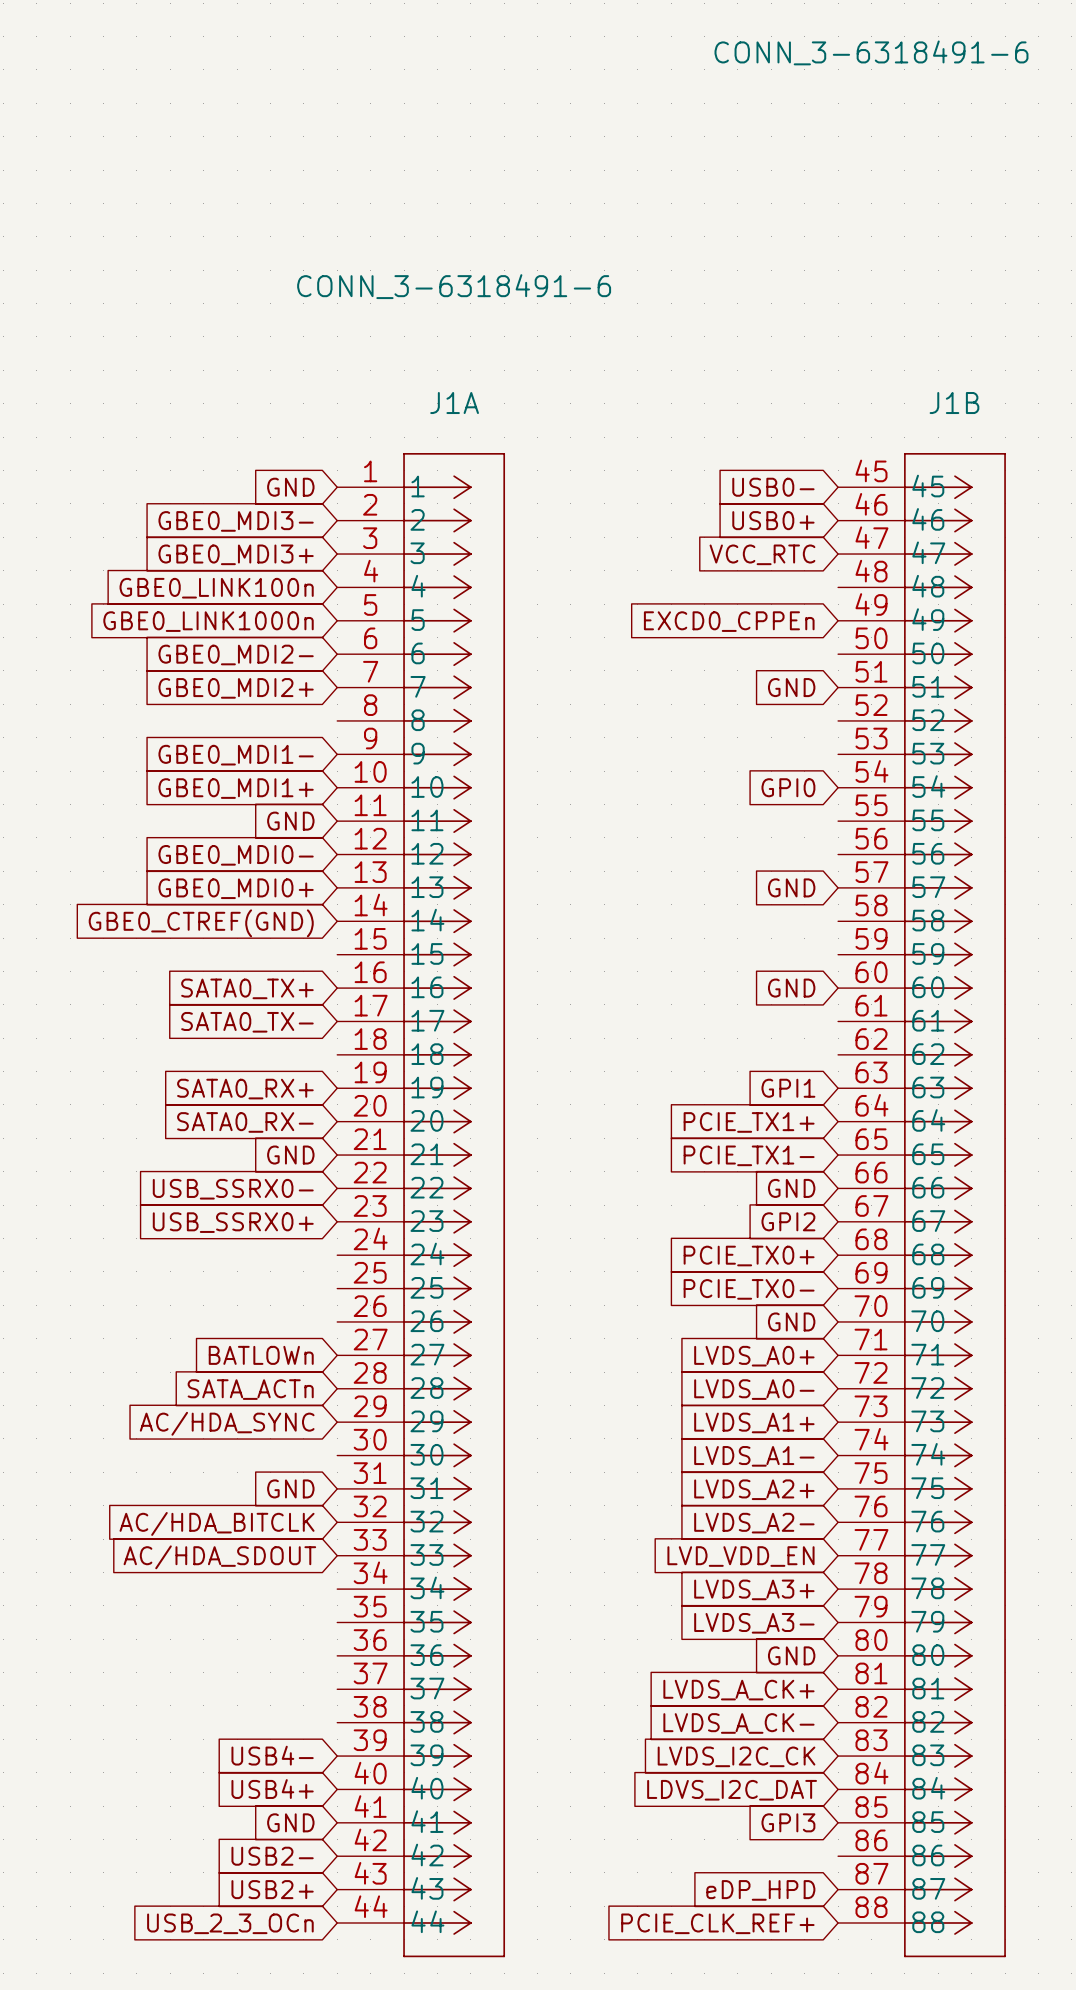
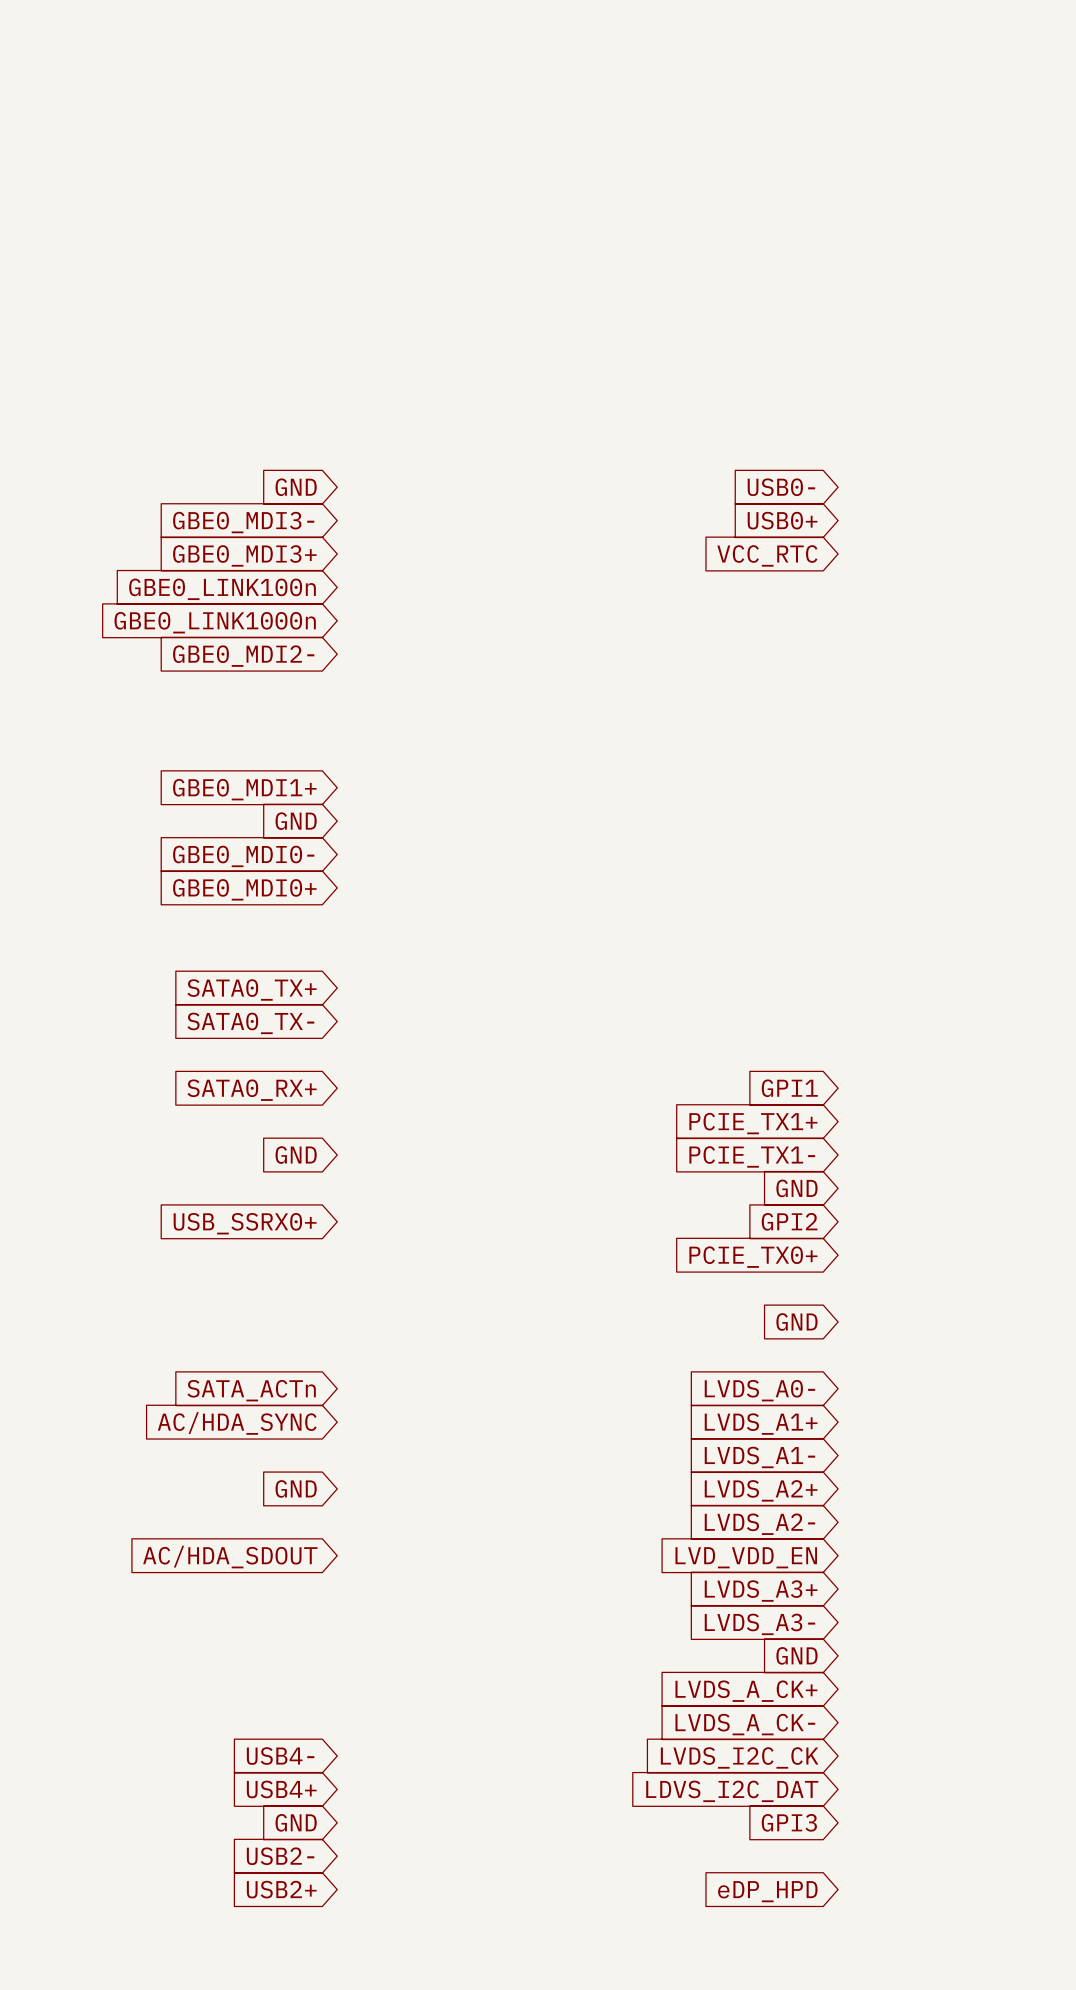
global label: EXCD0_CPPEn (729, 621) -> none
global label: GND (791, 687) -> none
global label: GBE0_MDI2+ (236, 688) -> none
global label: GBE0_MDI1- (236, 755) -> none
global label: GPI0 (788, 787) -> none
global label: GND (791, 887) -> none
global label: GBE0_CTREF(GND) (201, 923) -> none
global label: GND (791, 988) -> none
global label: SATA0_RX- (245, 1122) -> none
global label: USB_SSRX0- (233, 1189) -> none
J1A: CONN_3-6318491-6 (421, 1205) -> none
J1B: CONN_3-6318491-6 (921, 1205) -> none
global label: PCIE_TX0- (749, 1289) -> none
global label: BATLOWn (261, 1355) -> none
global label: LVDS_A0+ (754, 1356) -> none
global label: AC/HDA_BITCLK (217, 1523) -> none
global label: USB_2_3_OCn (230, 1923) -> none
global label: PCIE_CLK_REF+ (717, 1923) -> none

